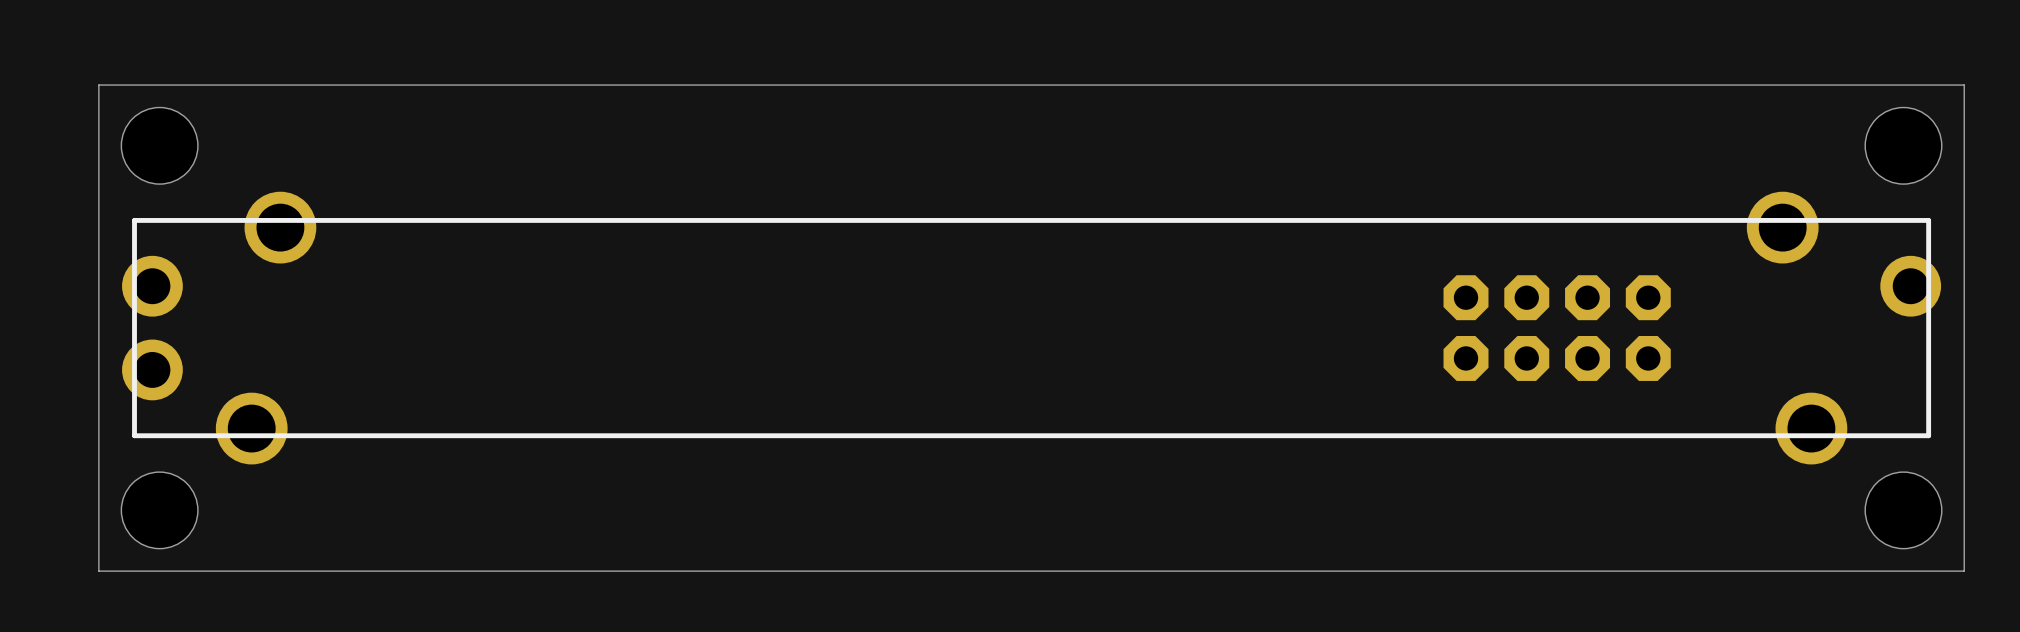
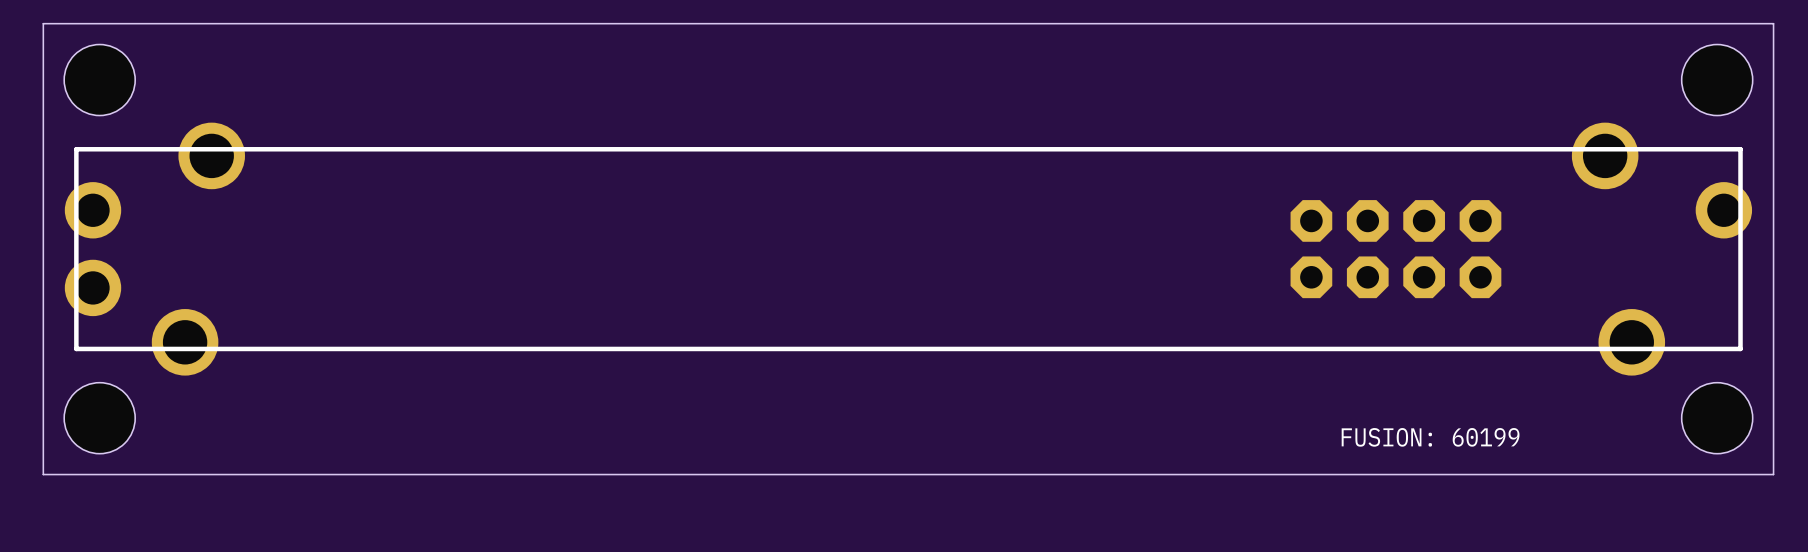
text: none -> FUSION: 60199 (1430, 437)

